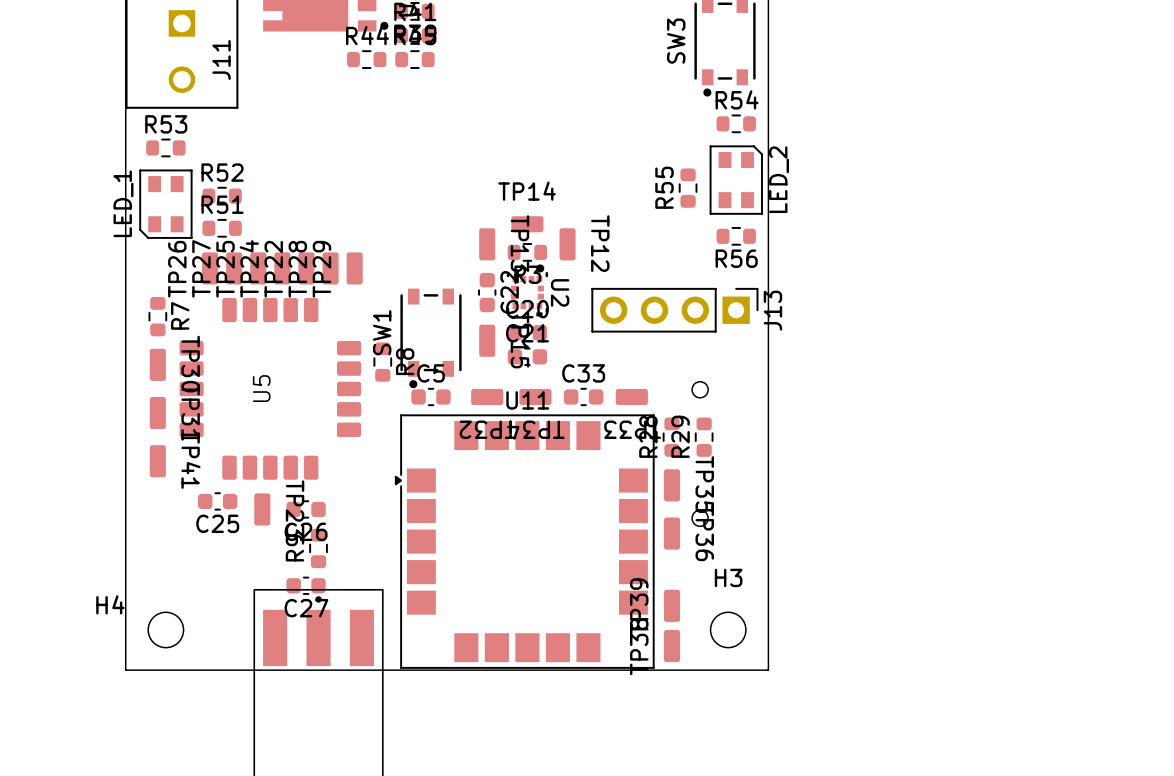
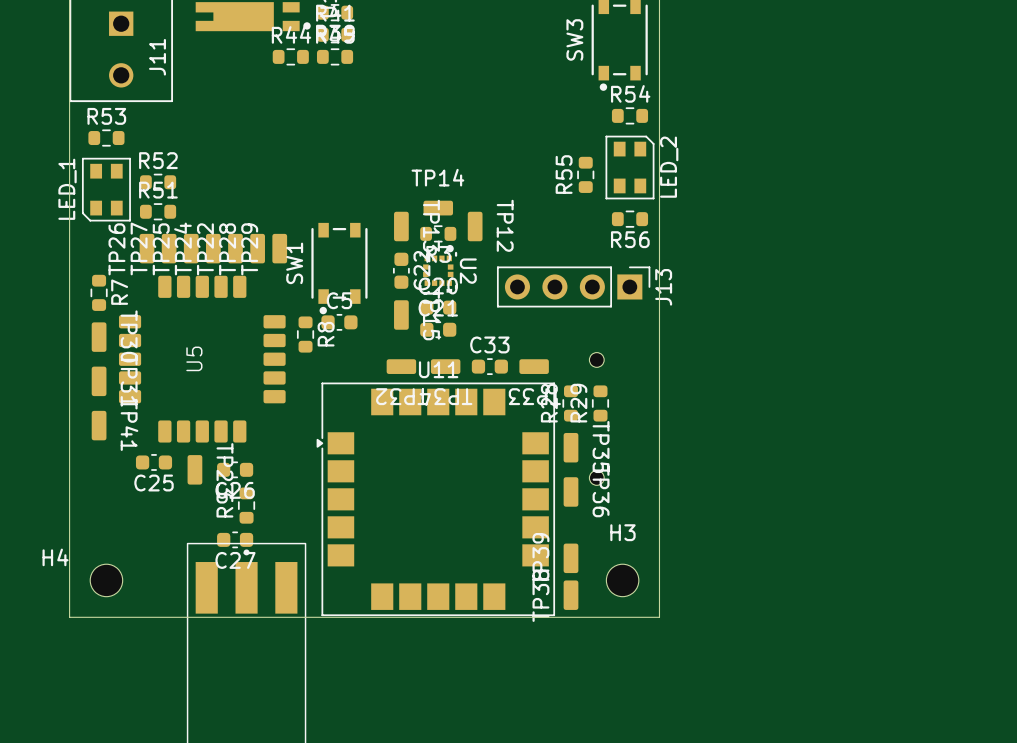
SW1 position: (431, 338) -> (339, 268)
C5 position: (431, 396) -> (339, 322)

